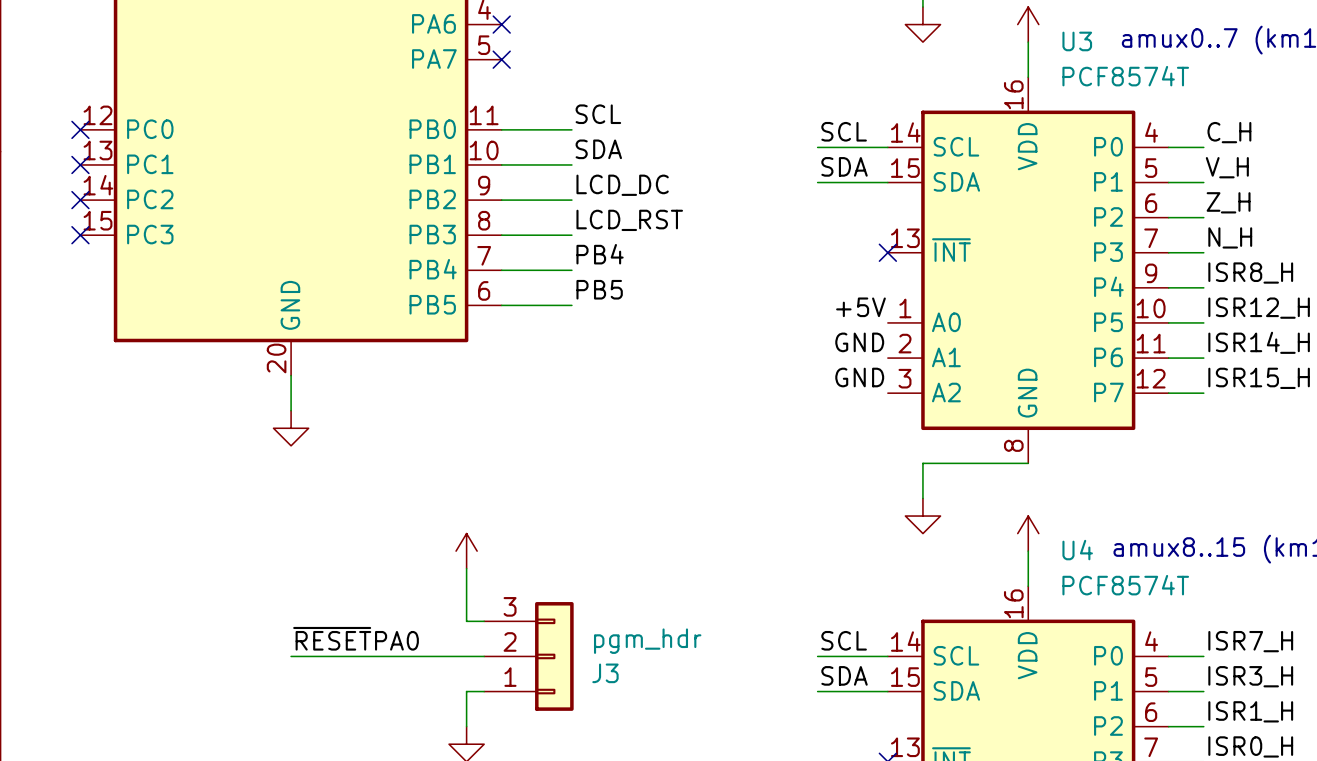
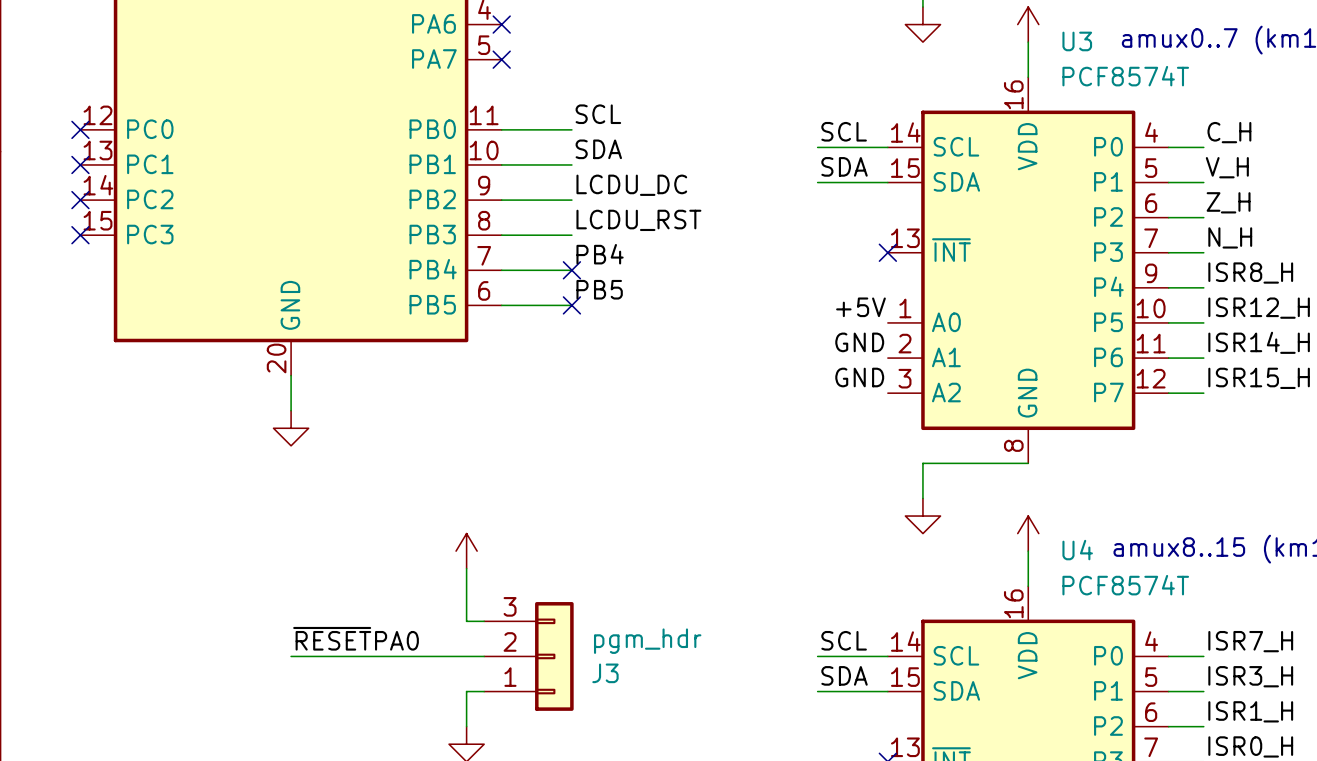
label: LCD_DC (622, 185) -> LCDU_DC (631, 185)
label: LCD_RST (629, 220) -> LCDU_RST (638, 220)
no-connect mark: none -> (571, 270)
no-connect mark: none -> (571, 305)

